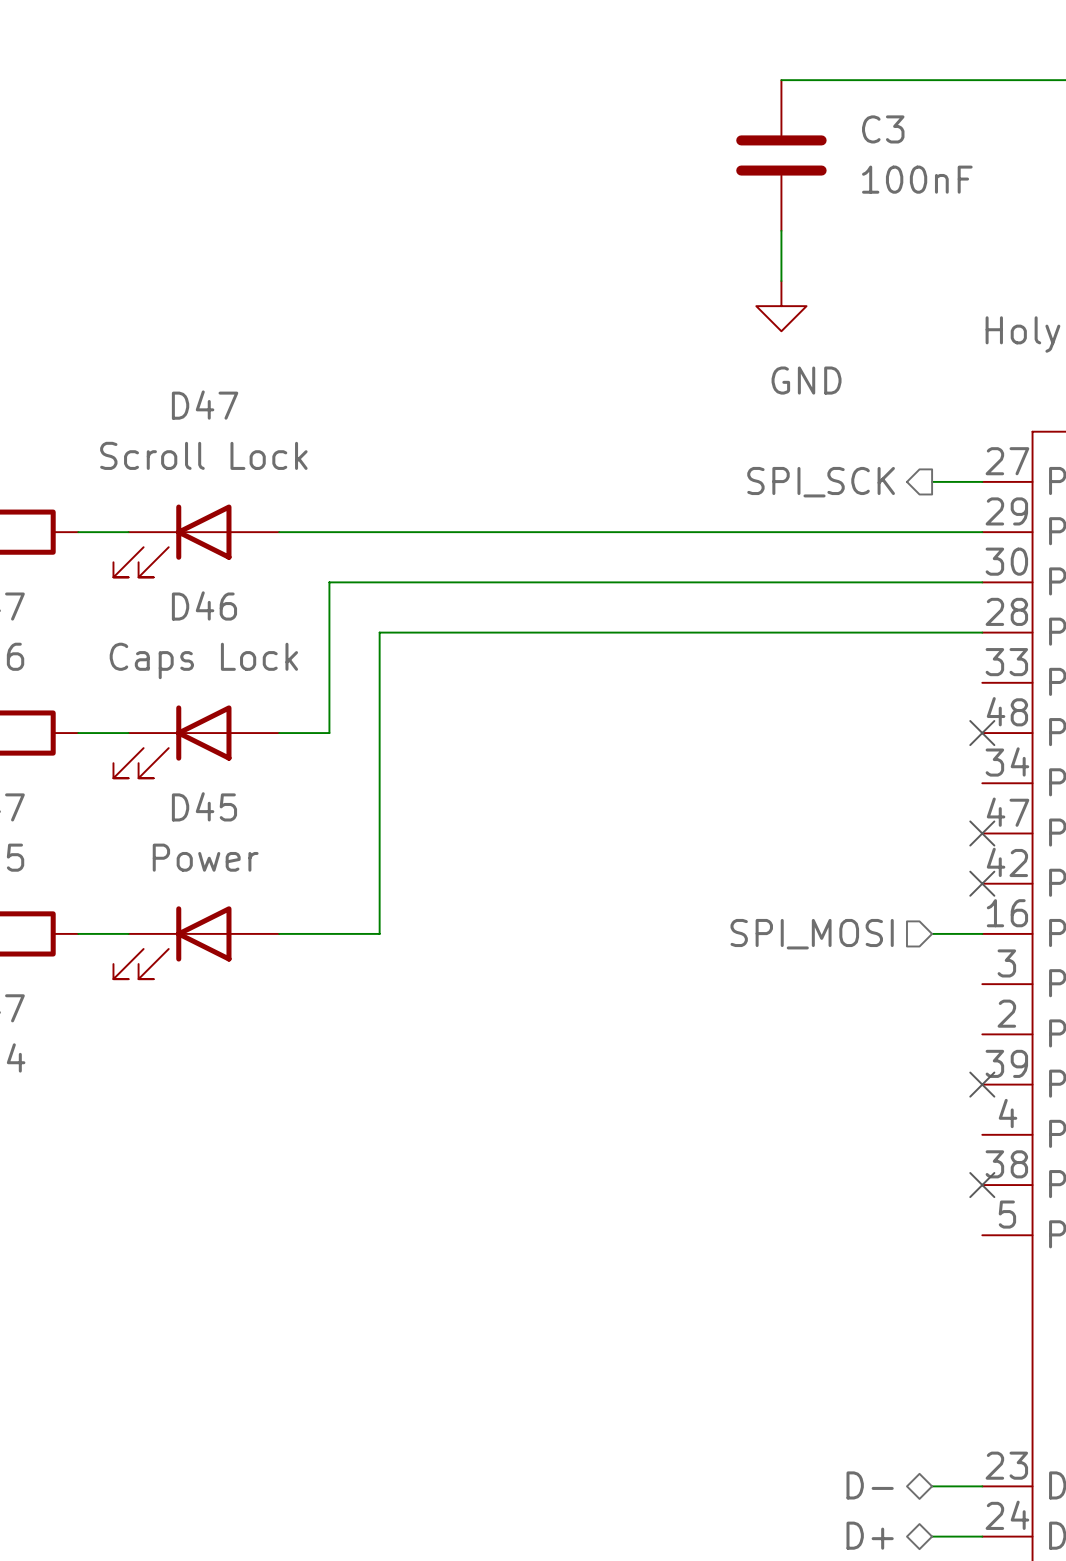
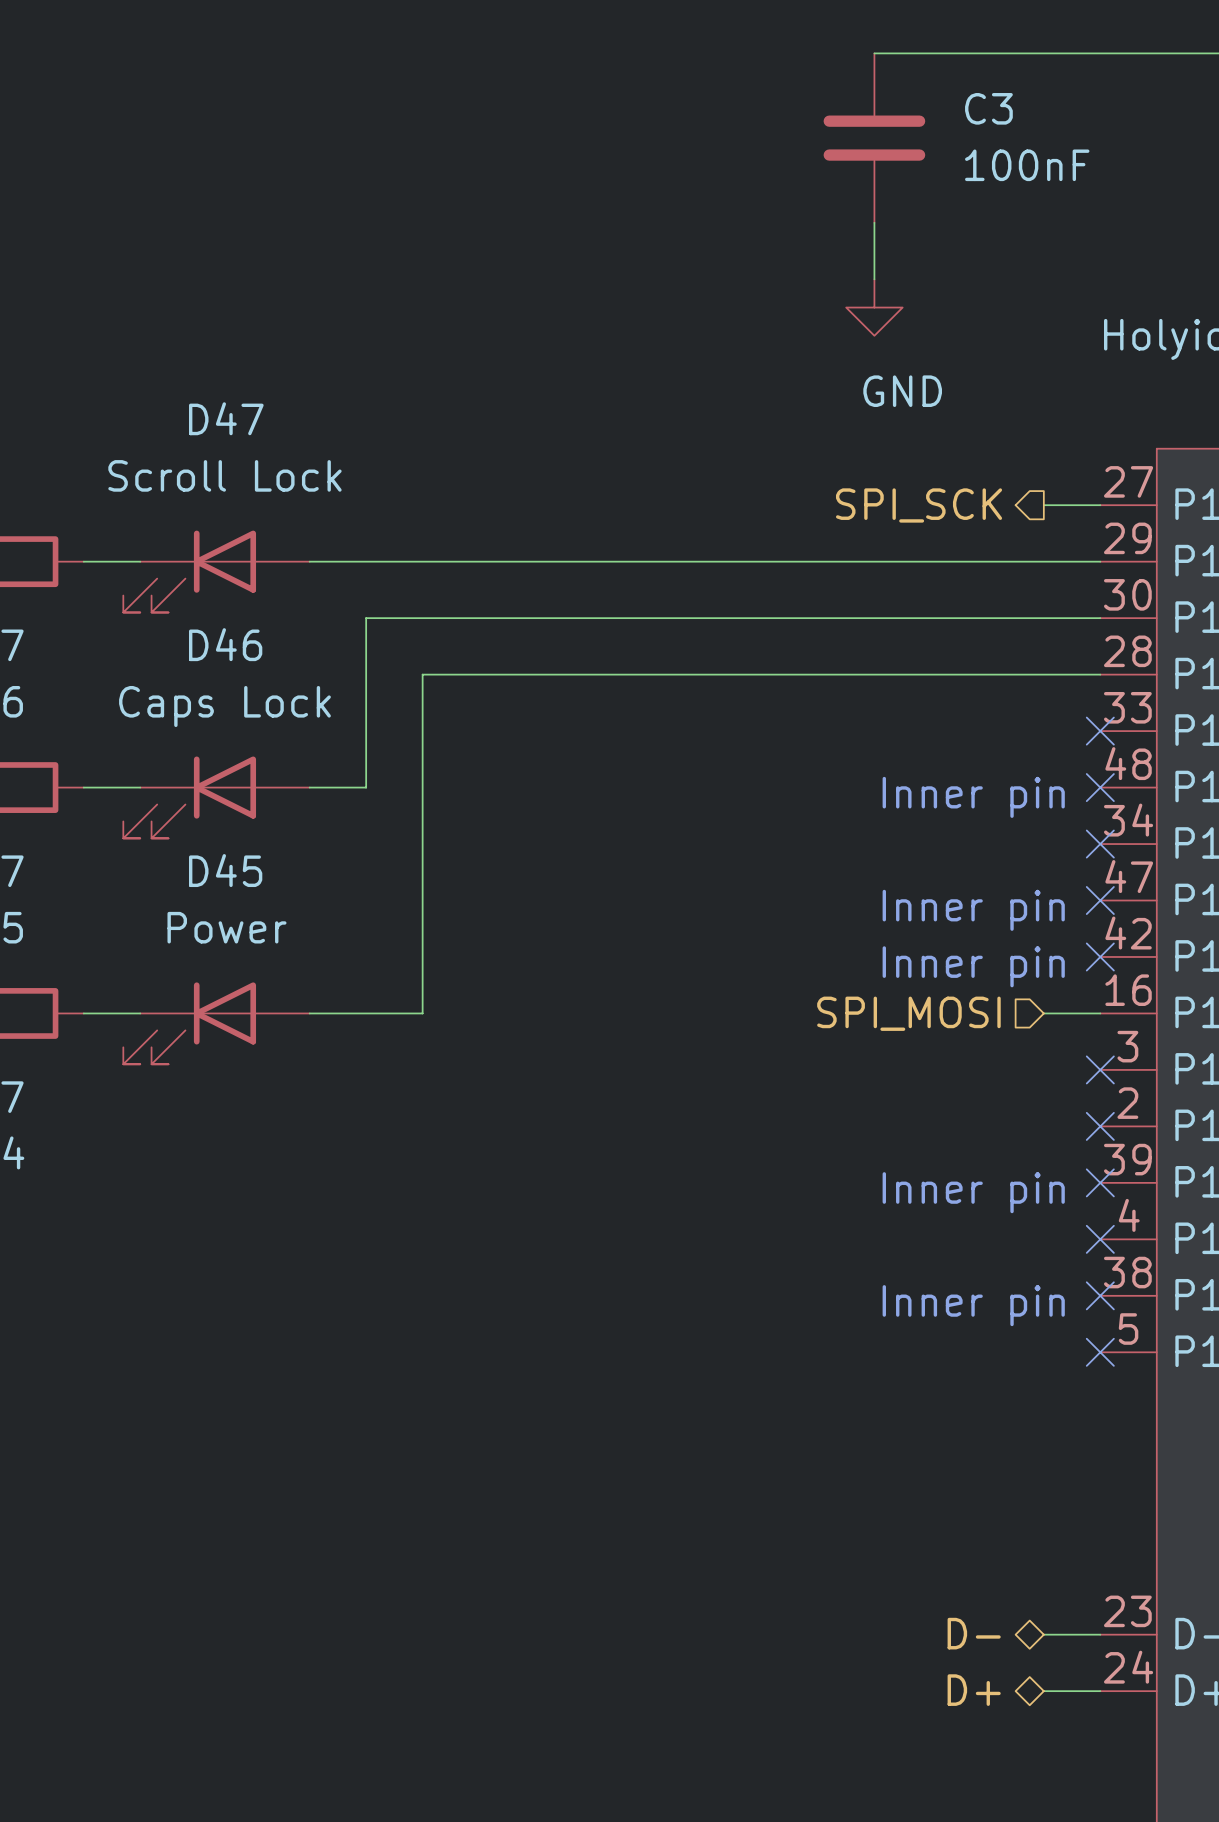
no-connect mark: none -> (1100, 731)
text: none -> Inner pin (973, 797)
no-connect mark: none -> (1100, 844)
text: none -> Inner pin (973, 910)
text: none -> Inner pin (973, 966)
no-connect mark: none -> (1100, 1069)
no-connect mark: none -> (1100, 1126)
text: none -> Inner pin (973, 1192)
no-connect mark: none -> (1100, 1239)
text: none -> Inner pin (973, 1305)
no-connect mark: none -> (1100, 1352)

